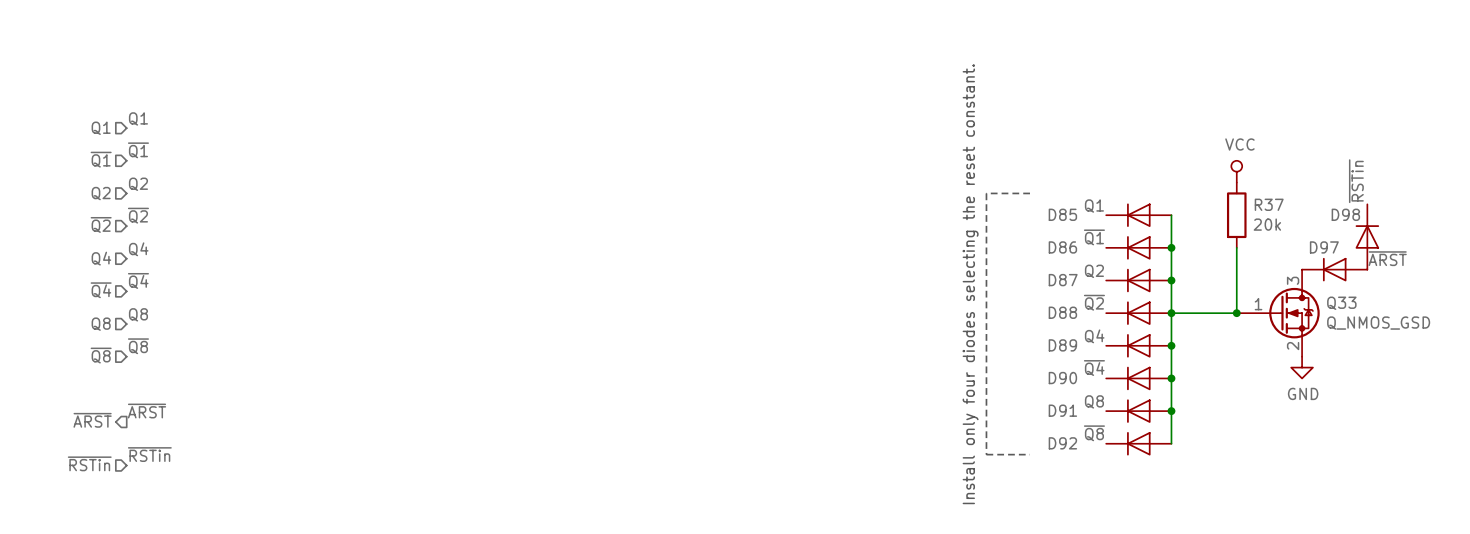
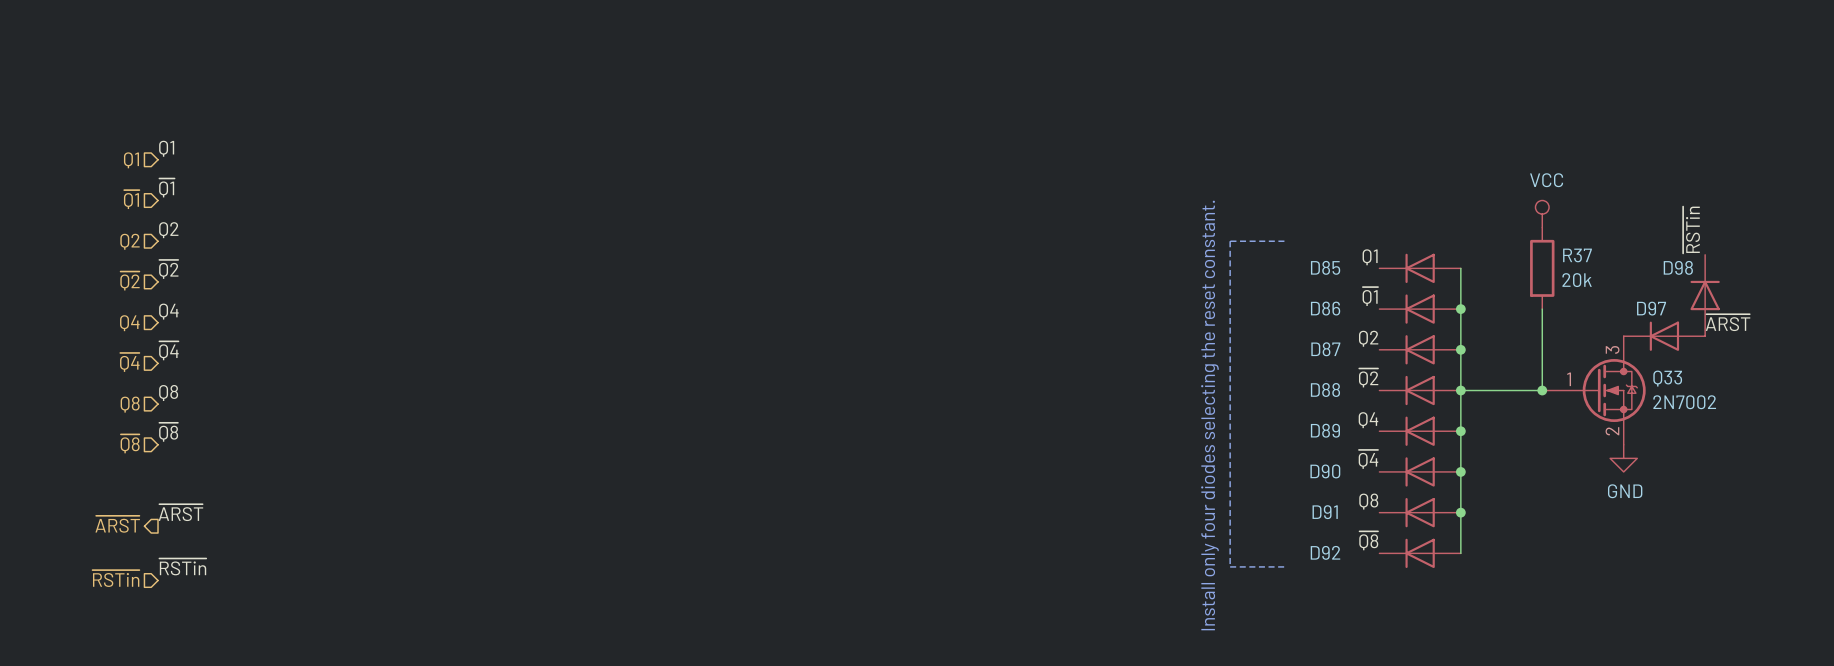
Q33 value: Q_NMOS_GSD (1378, 323) -> 2N7002 (1684, 402)

